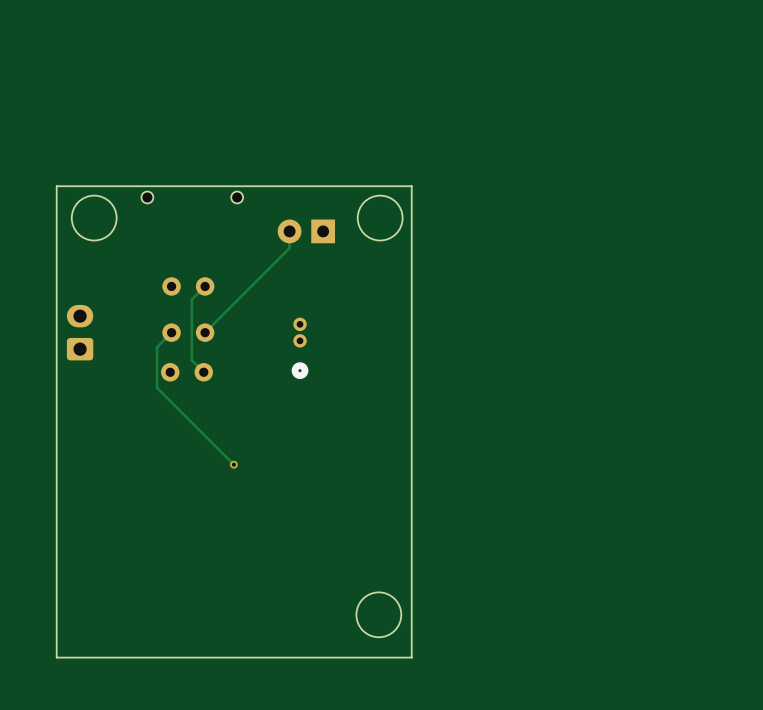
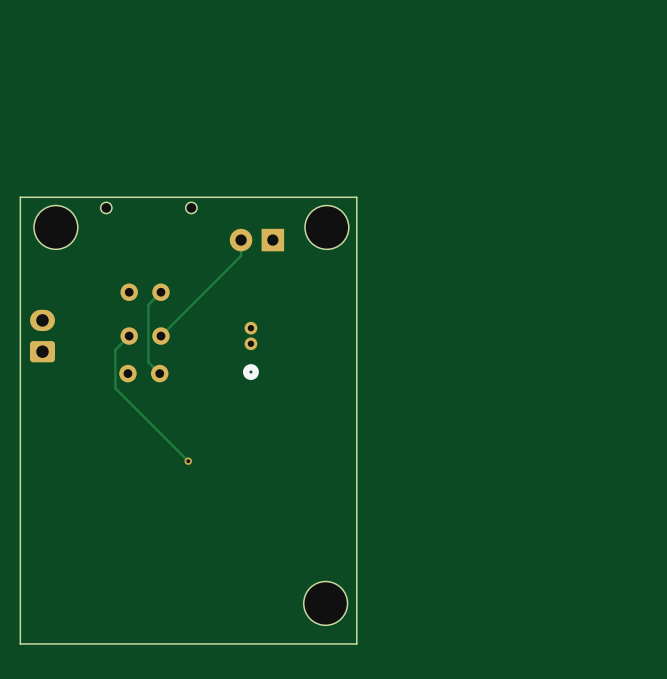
round board edge: [71, 195, 117, 241] -> none
round board edge: [357, 195, 403, 241] -> none
part: none -> (55, 227)
part: none -> (326, 227)
round board edge: [356, 592, 402, 638] -> none
part: none -> (325, 603)

